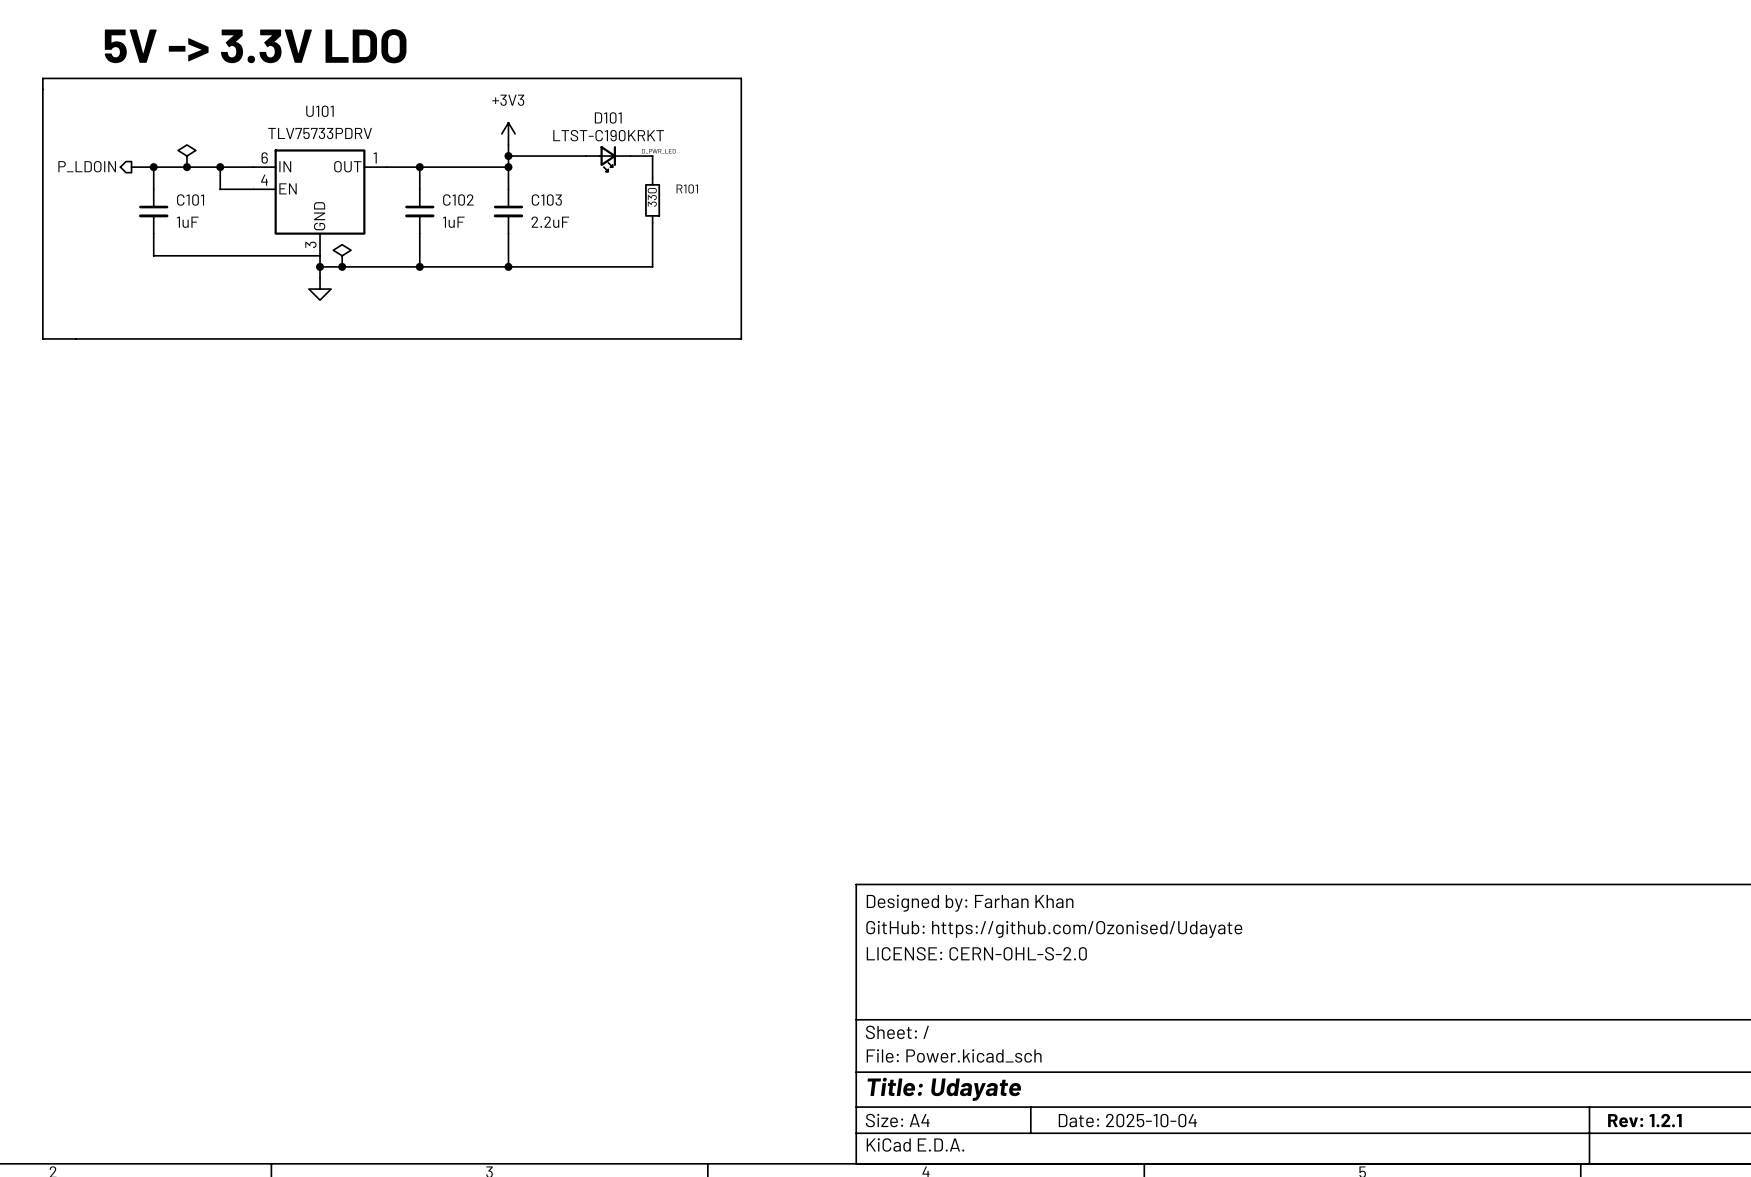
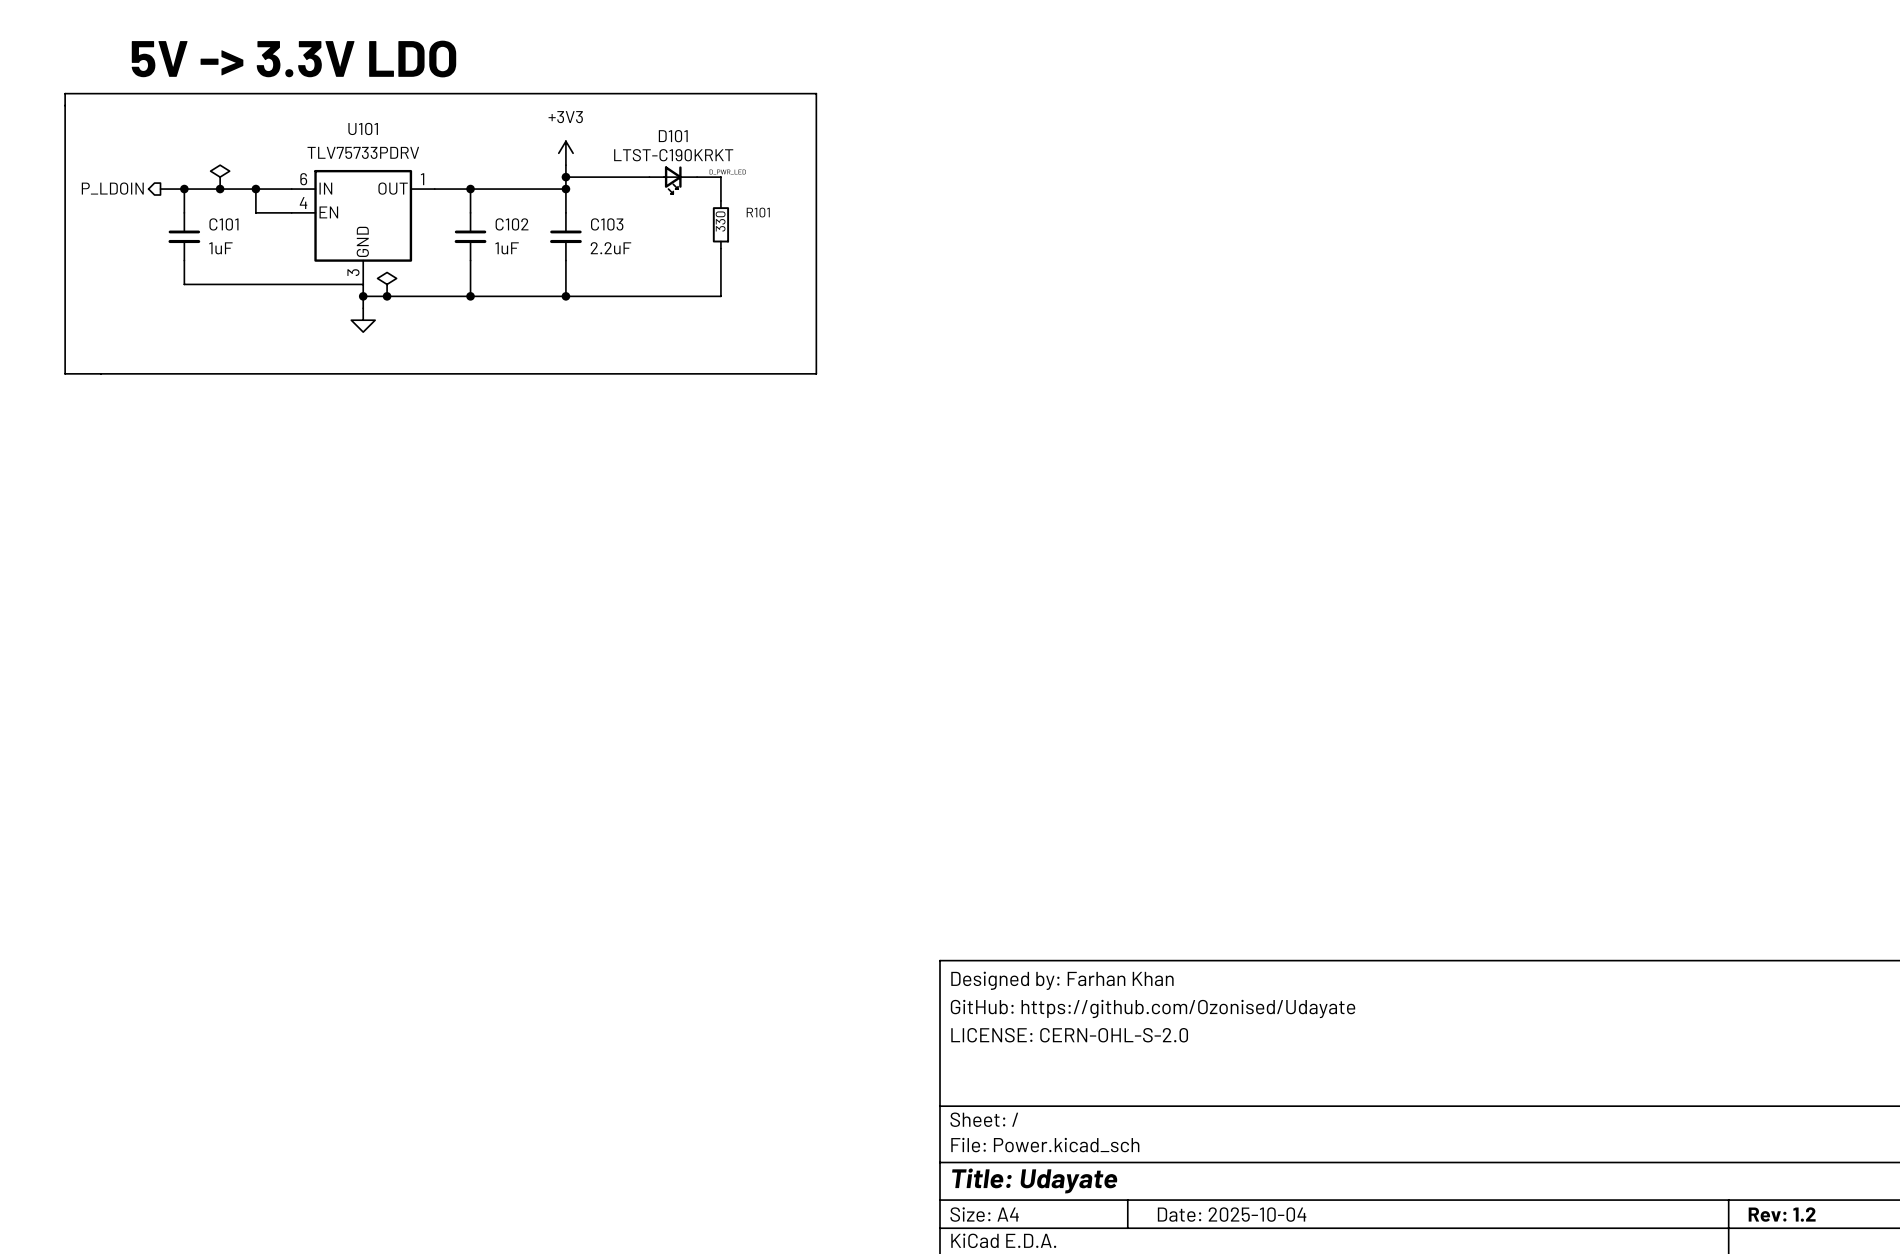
title block: Rev: 1.2.1 (1644, 1120) -> Rev: 1.2 (1782, 1214)

